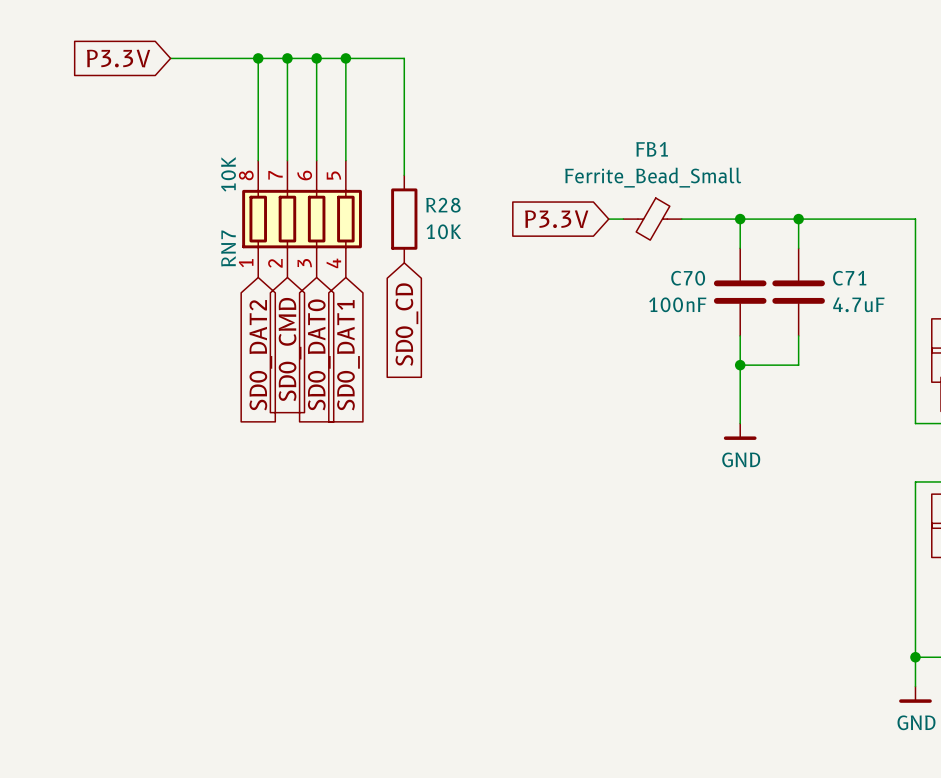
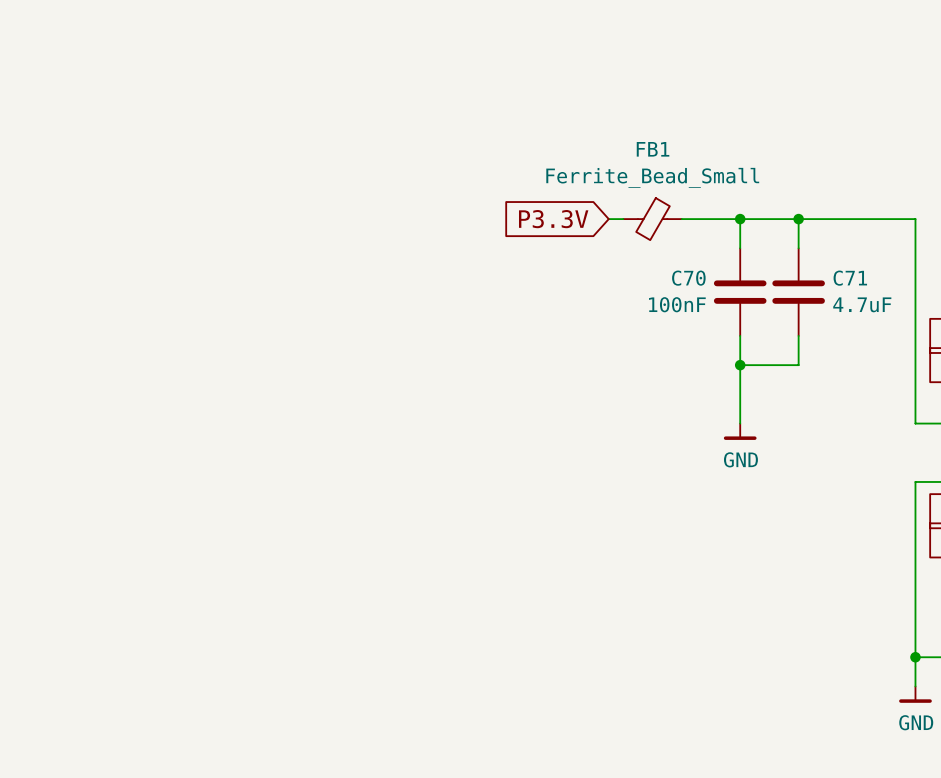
global label: P3.3V (118, 58) -> none
wire: (170, 58) (404, 58) (404, 175) -> none
wire: (258, 58) (258, 160) -> none
junction: (258, 58) -> none
wire: (287, 58) (287, 160) -> none
junction: (287, 58) -> none
wire: (316, 58) (316, 160) -> none
junction: (316, 58) -> none
wire: (345, 58) (345, 160) -> none
junction: (345, 58) -> none
RN7: 10K (302, 219) -> none
R28: 10K (404, 219) -> none
global label: SD0_CD (406, 324) -> none
global label: SD0_CMD (290, 349) -> none
global label: SD0_DAT0 (319, 354) -> none
global label: SD0_DAT2 (260, 355) -> none
global label: SD0_DAT1 (348, 355) -> none

